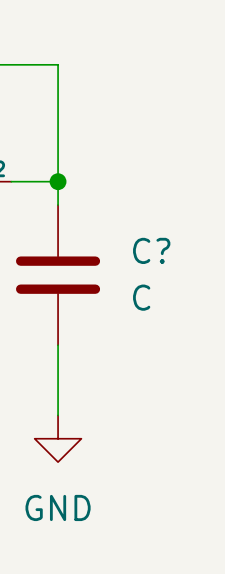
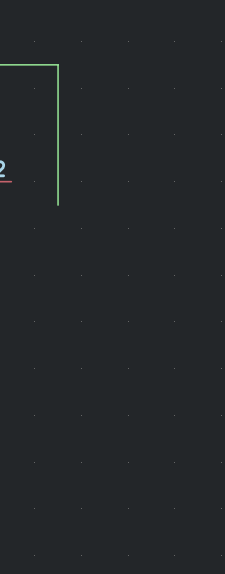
wire: (11, 181) (58, 181) -> none
junction: (58, 181) -> none
C?: C (58, 275) -> none
wire: (58, 345) (58, 415) -> none
power symbol: GND (58, 438) -> none

